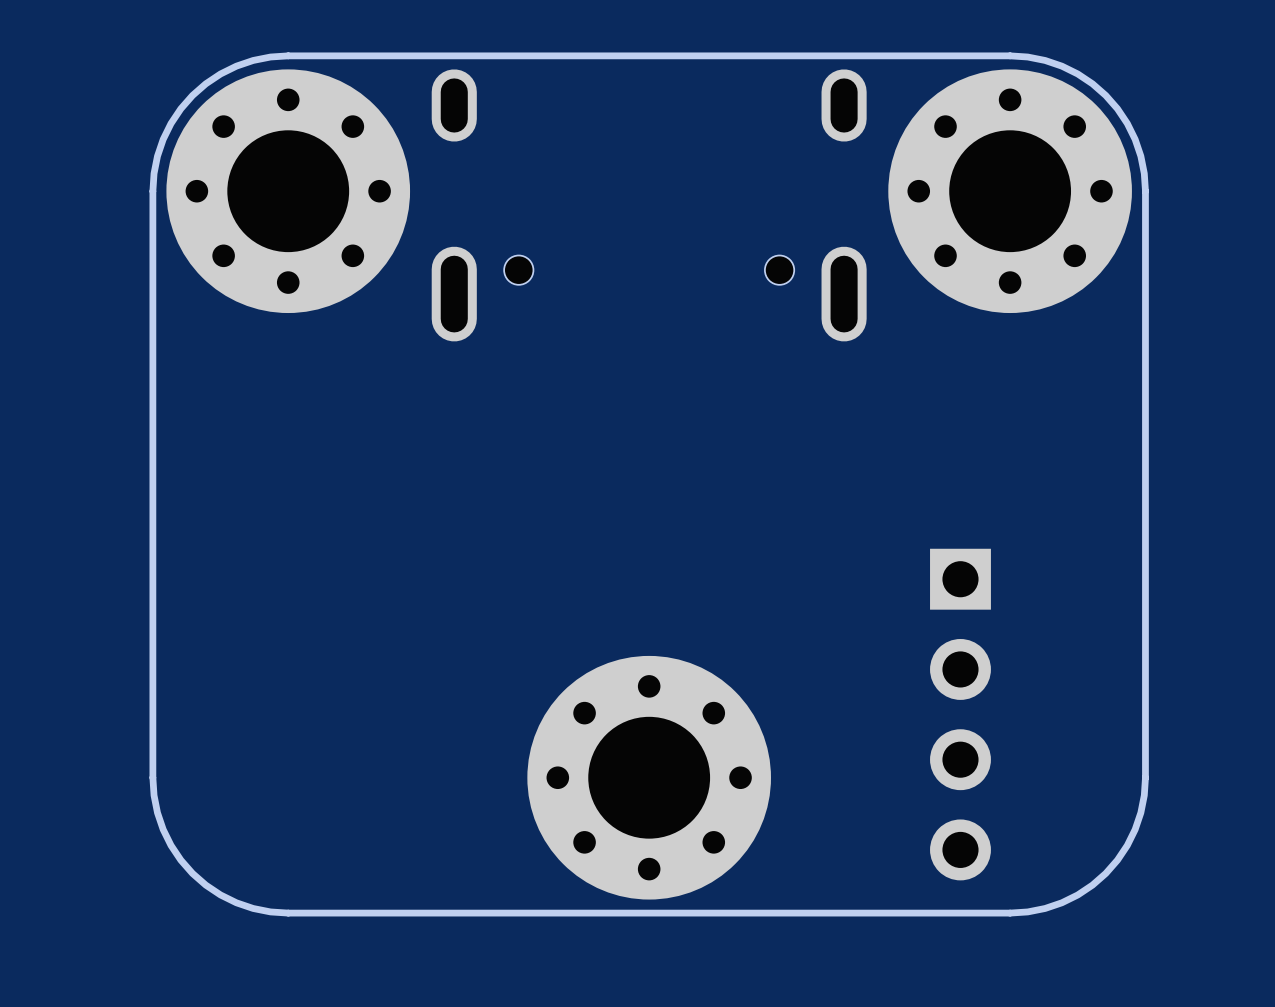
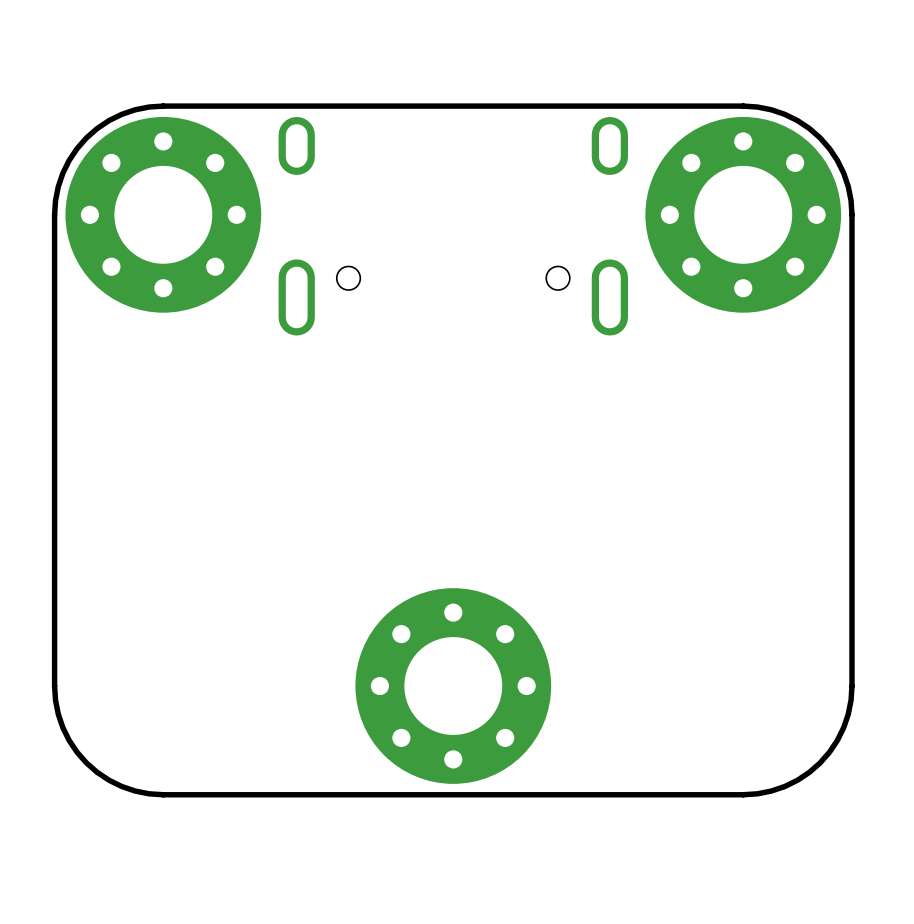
part: (960, 714) -> none

